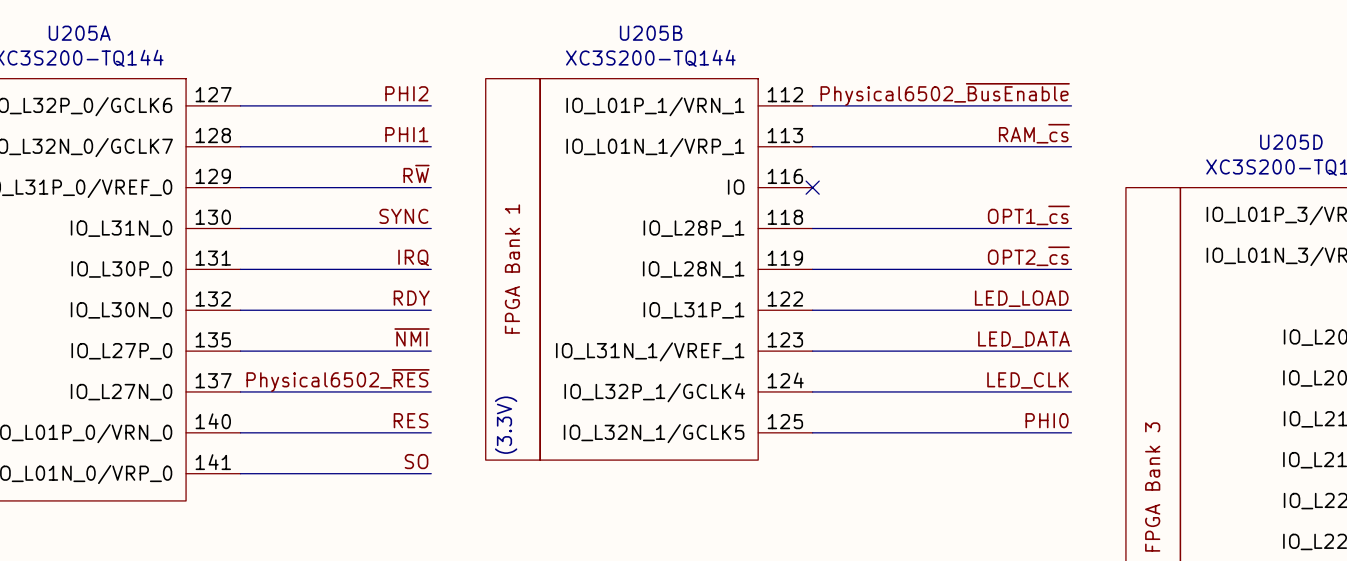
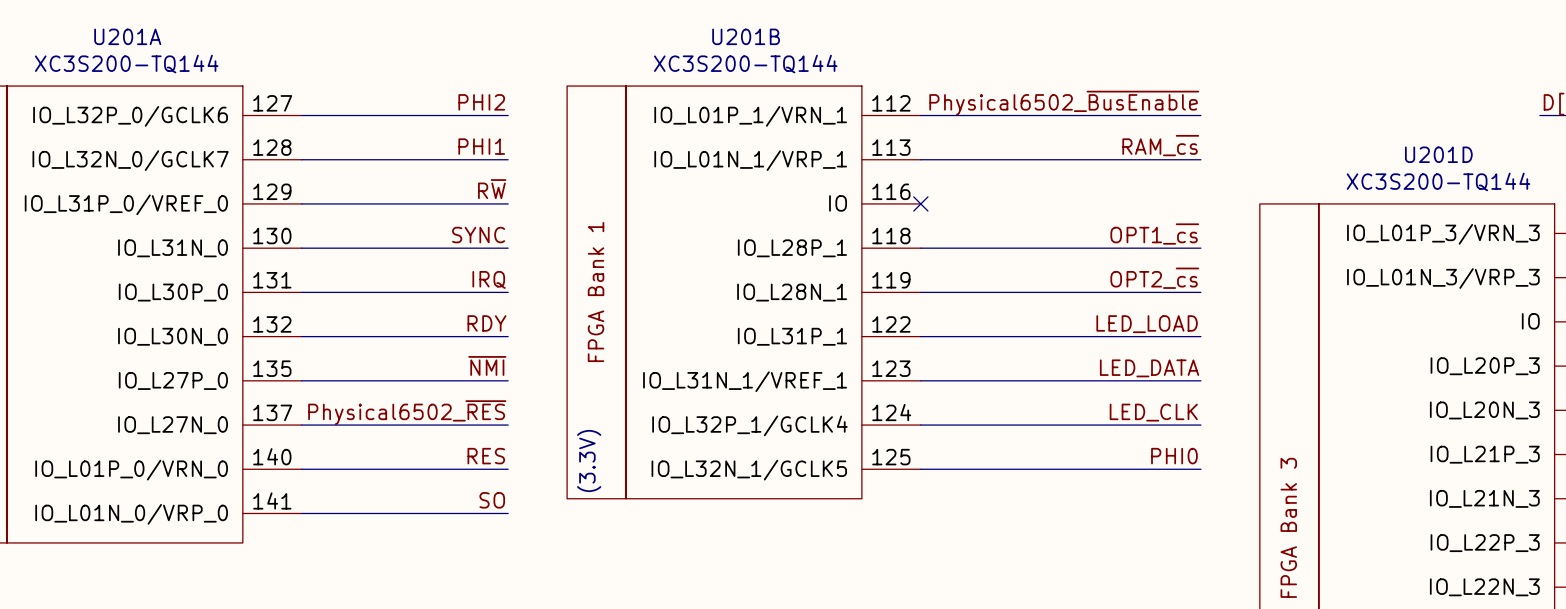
U205A name: U205A (79, 33) -> U201A (127, 36)
U205B name: U205B (651, 33) -> U201B (746, 36)
U205D name: U205D (1291, 142) -> U201D (1438, 154)

